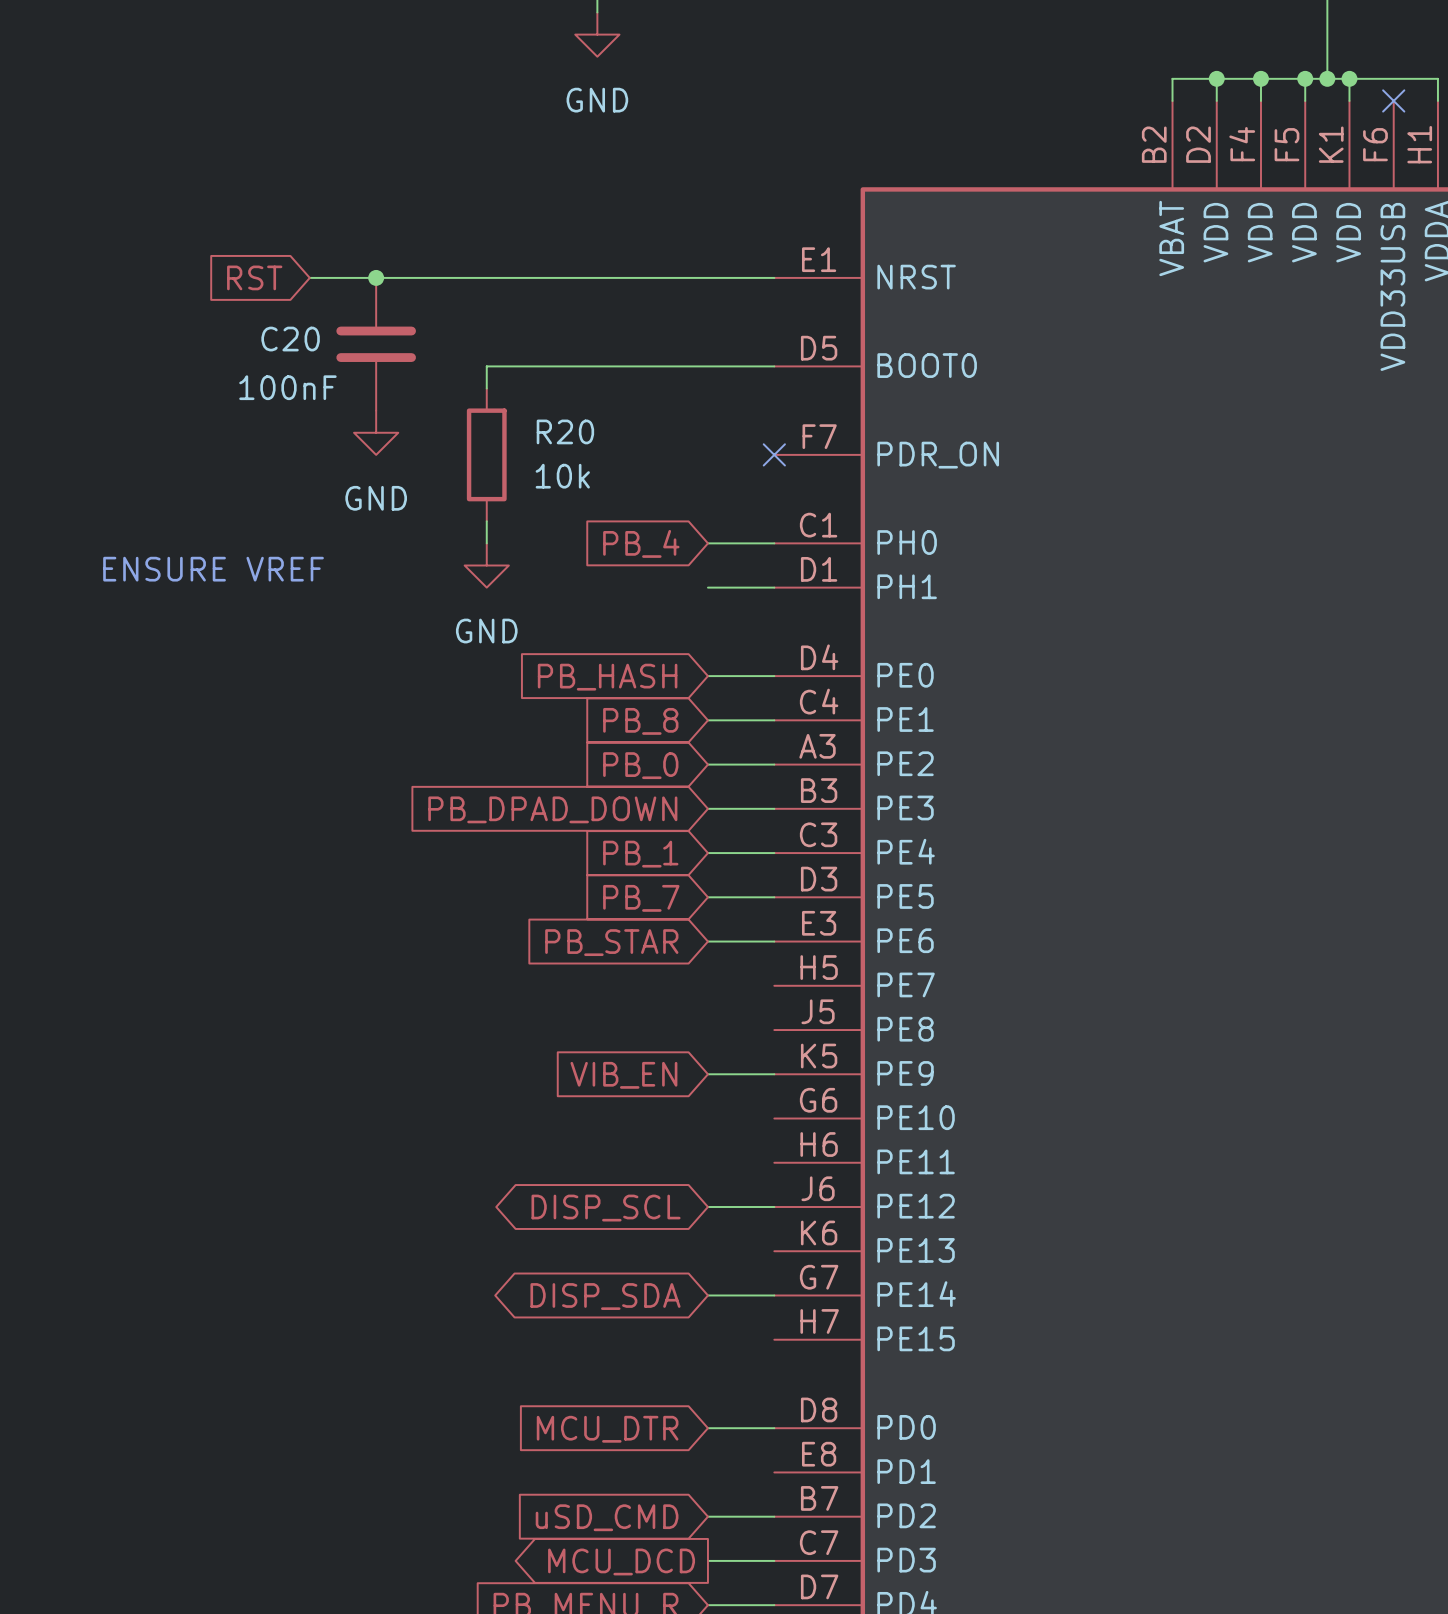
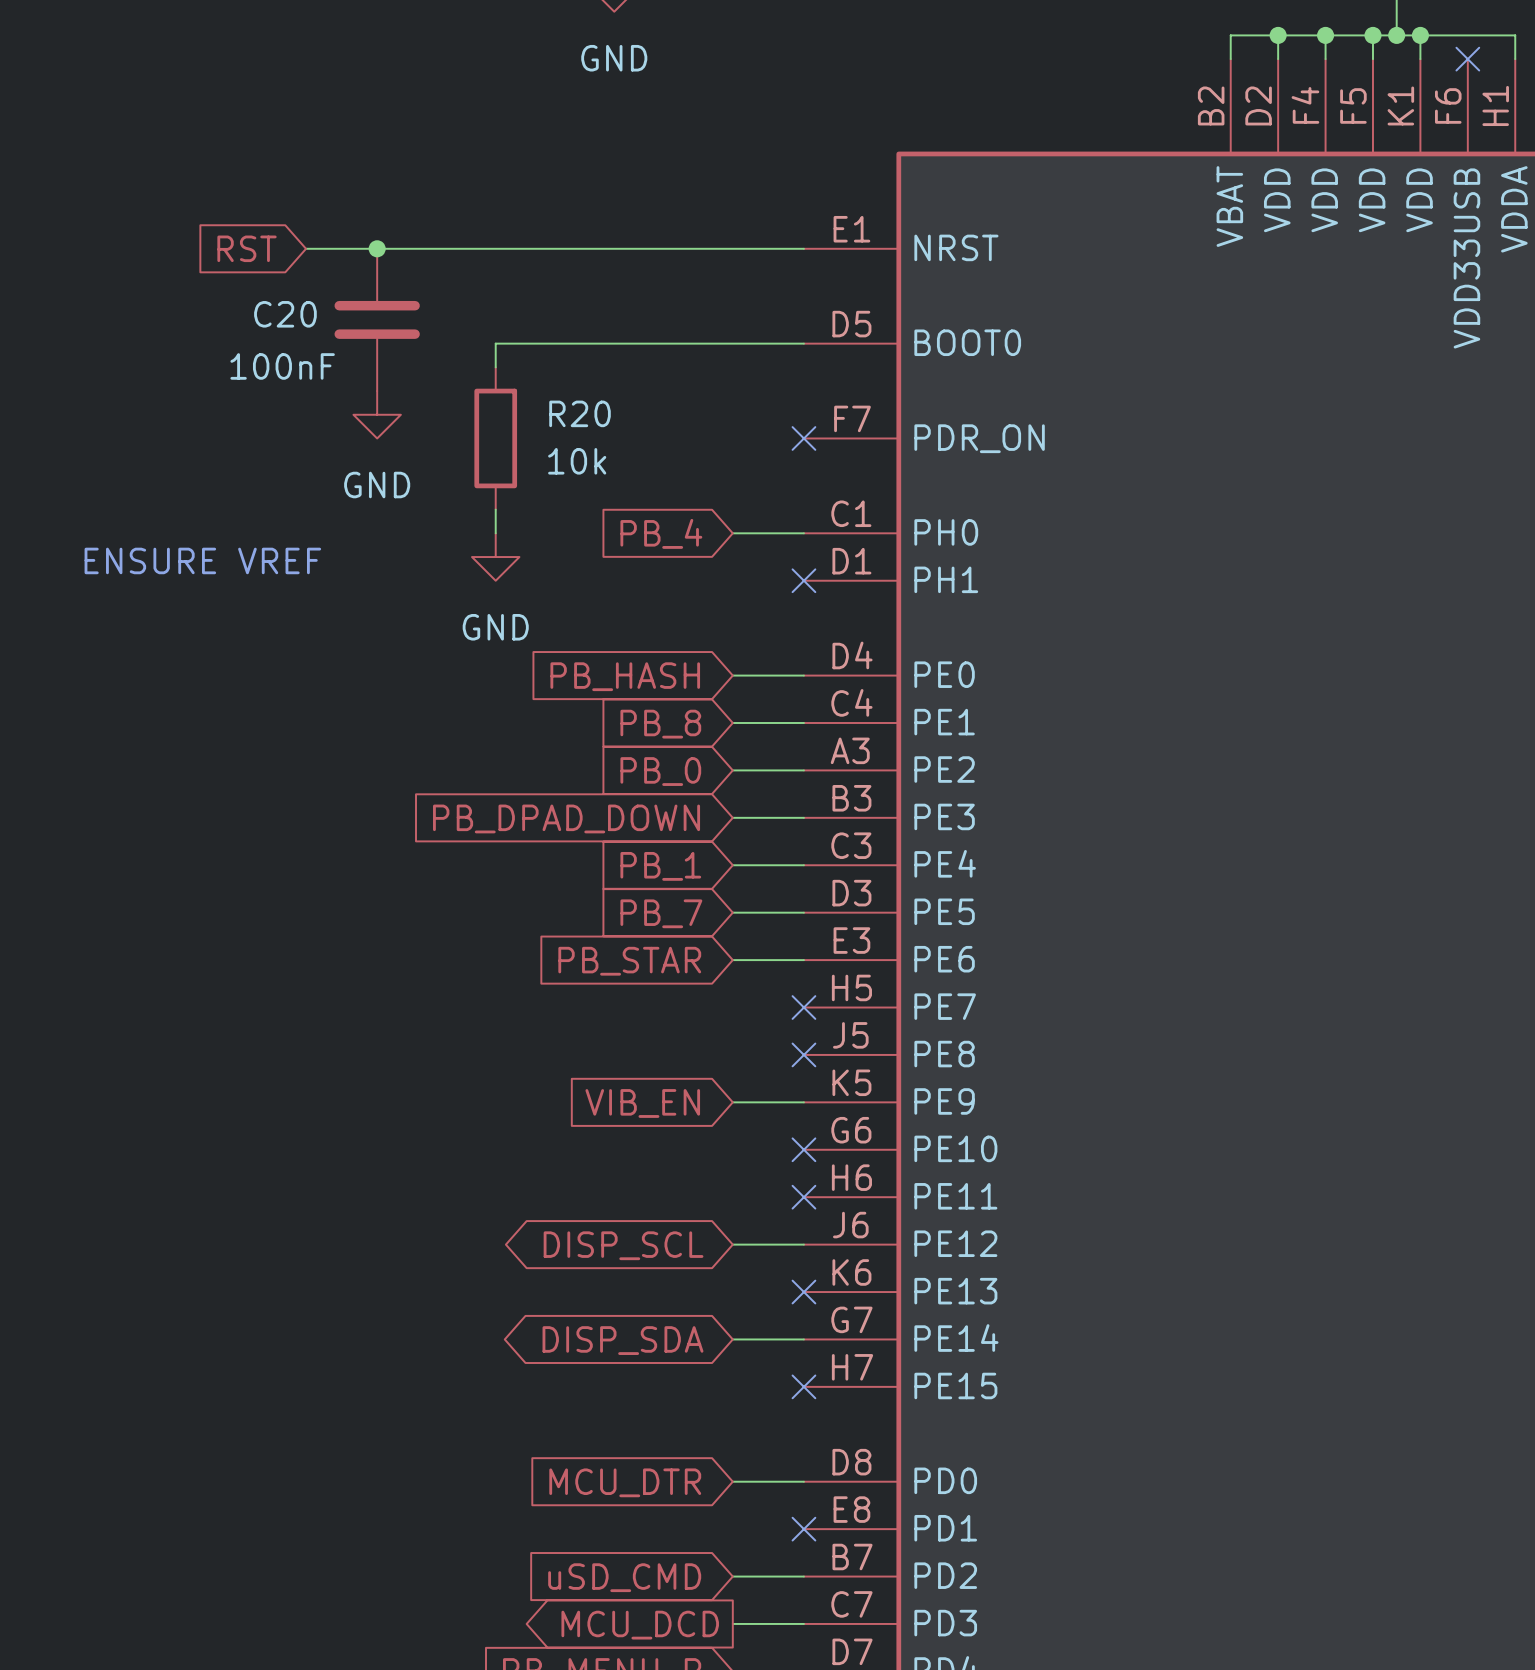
wire: (707, 587) (774, 587) -> none
no-connect mark: none -> (803, 580)
no-connect mark: none -> (803, 1007)
no-connect mark: none -> (803, 1054)
no-connect mark: none -> (803, 1149)
no-connect mark: none -> (803, 1197)
no-connect mark: none -> (803, 1292)
no-connect mark: none -> (803, 1386)
no-connect mark: none -> (803, 1529)

